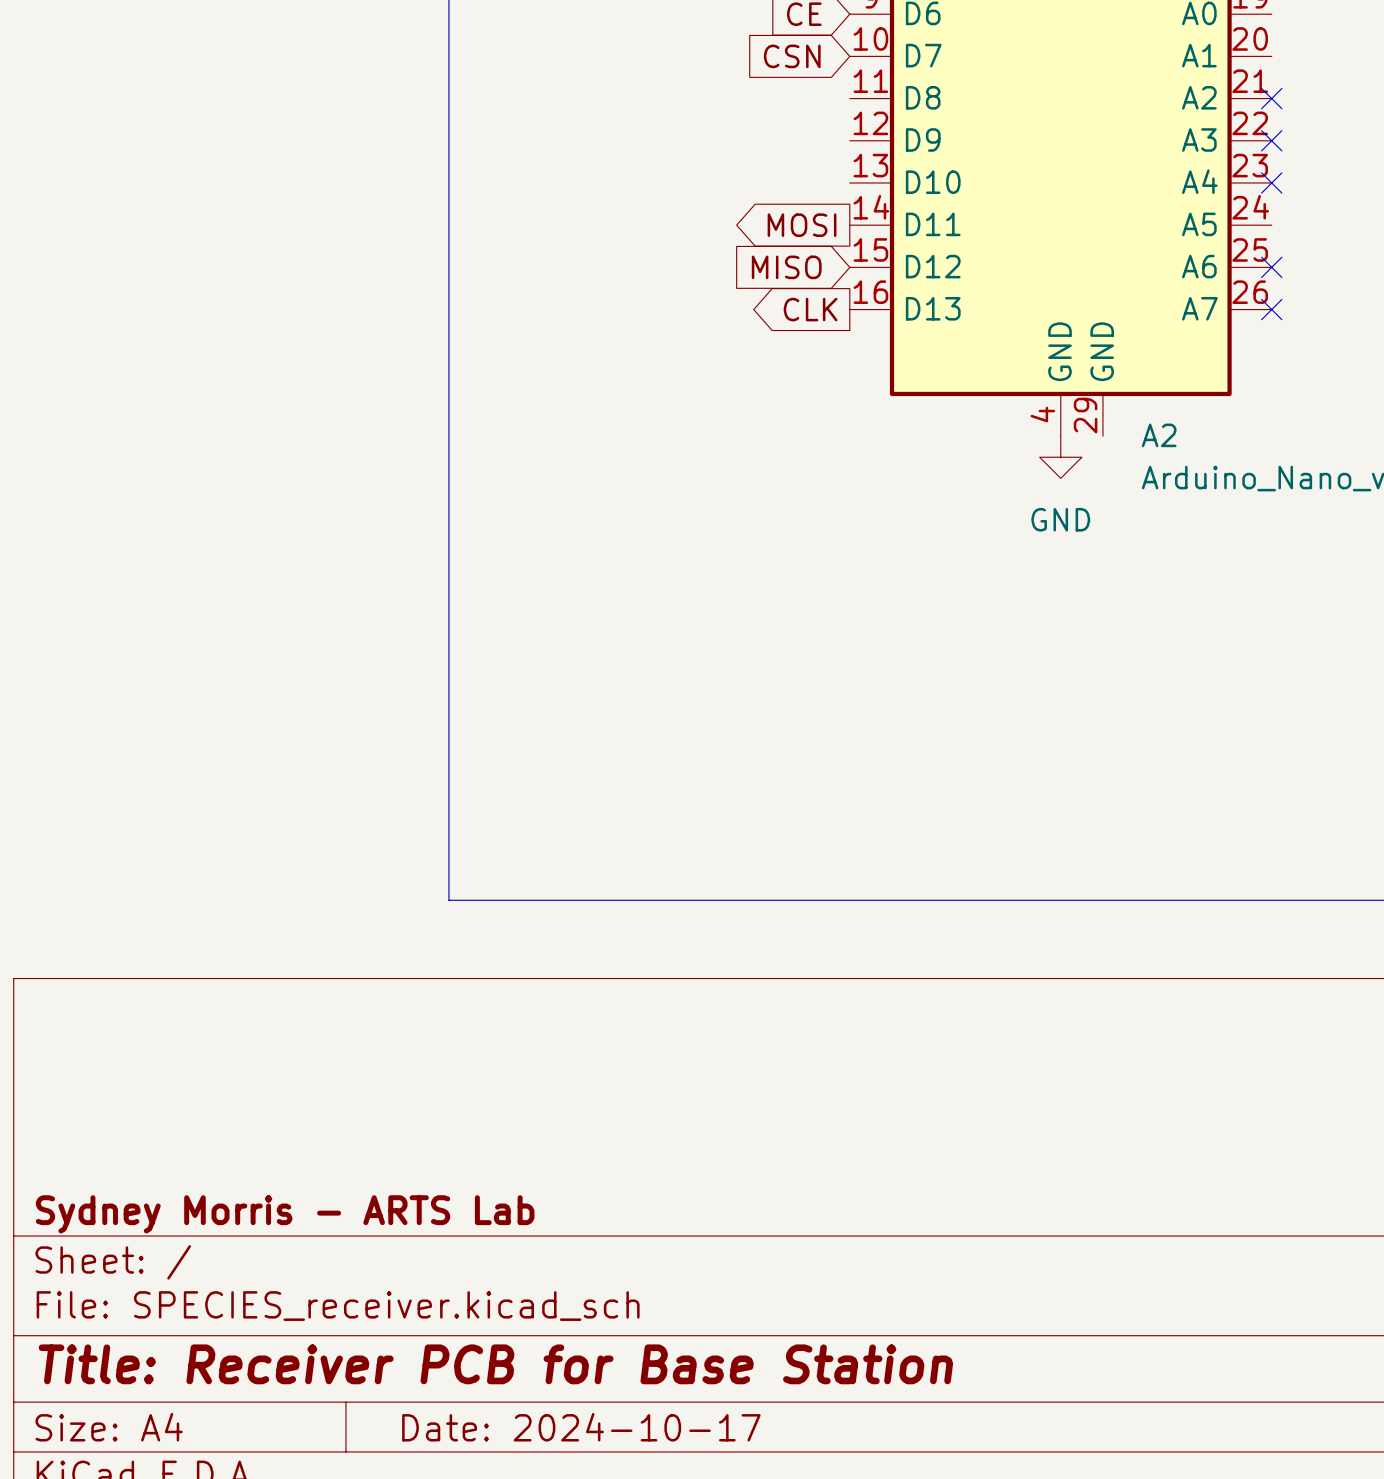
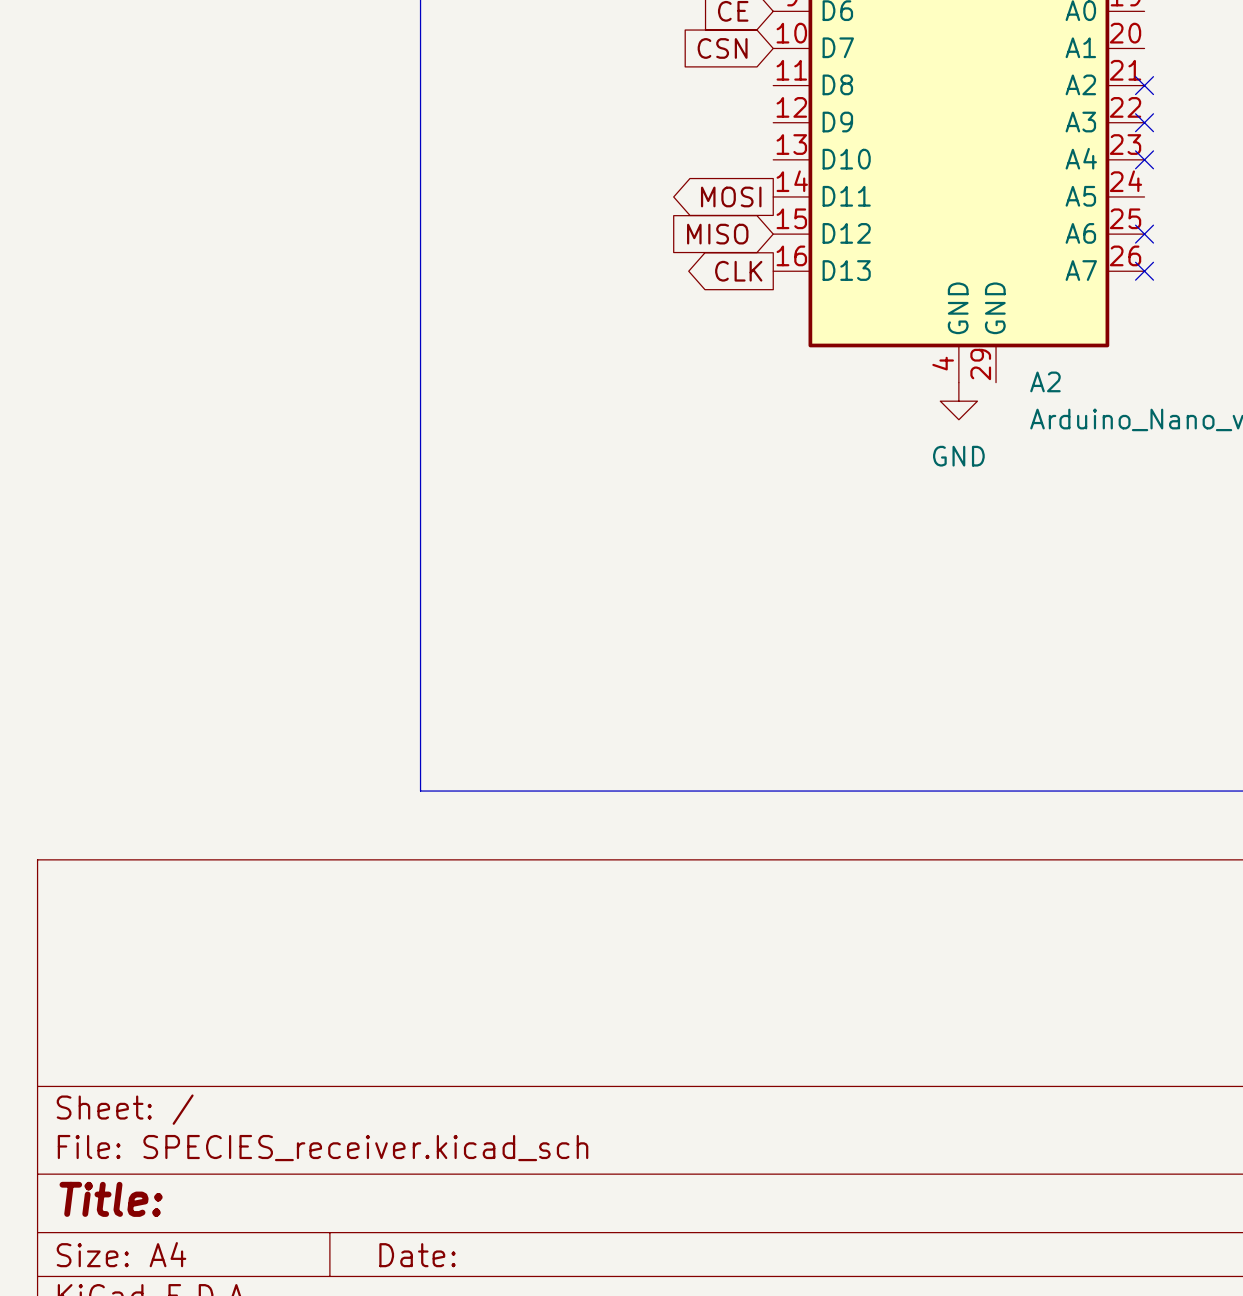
title block: Sydney Morris - ARTS Lab (285, 1214) -> none
title block: Title: Receiver PCB for Base Station (495, 1364) -> Title: (111, 1199)
title block: Date: 2024-10-17 (581, 1427) -> Date: (417, 1255)

